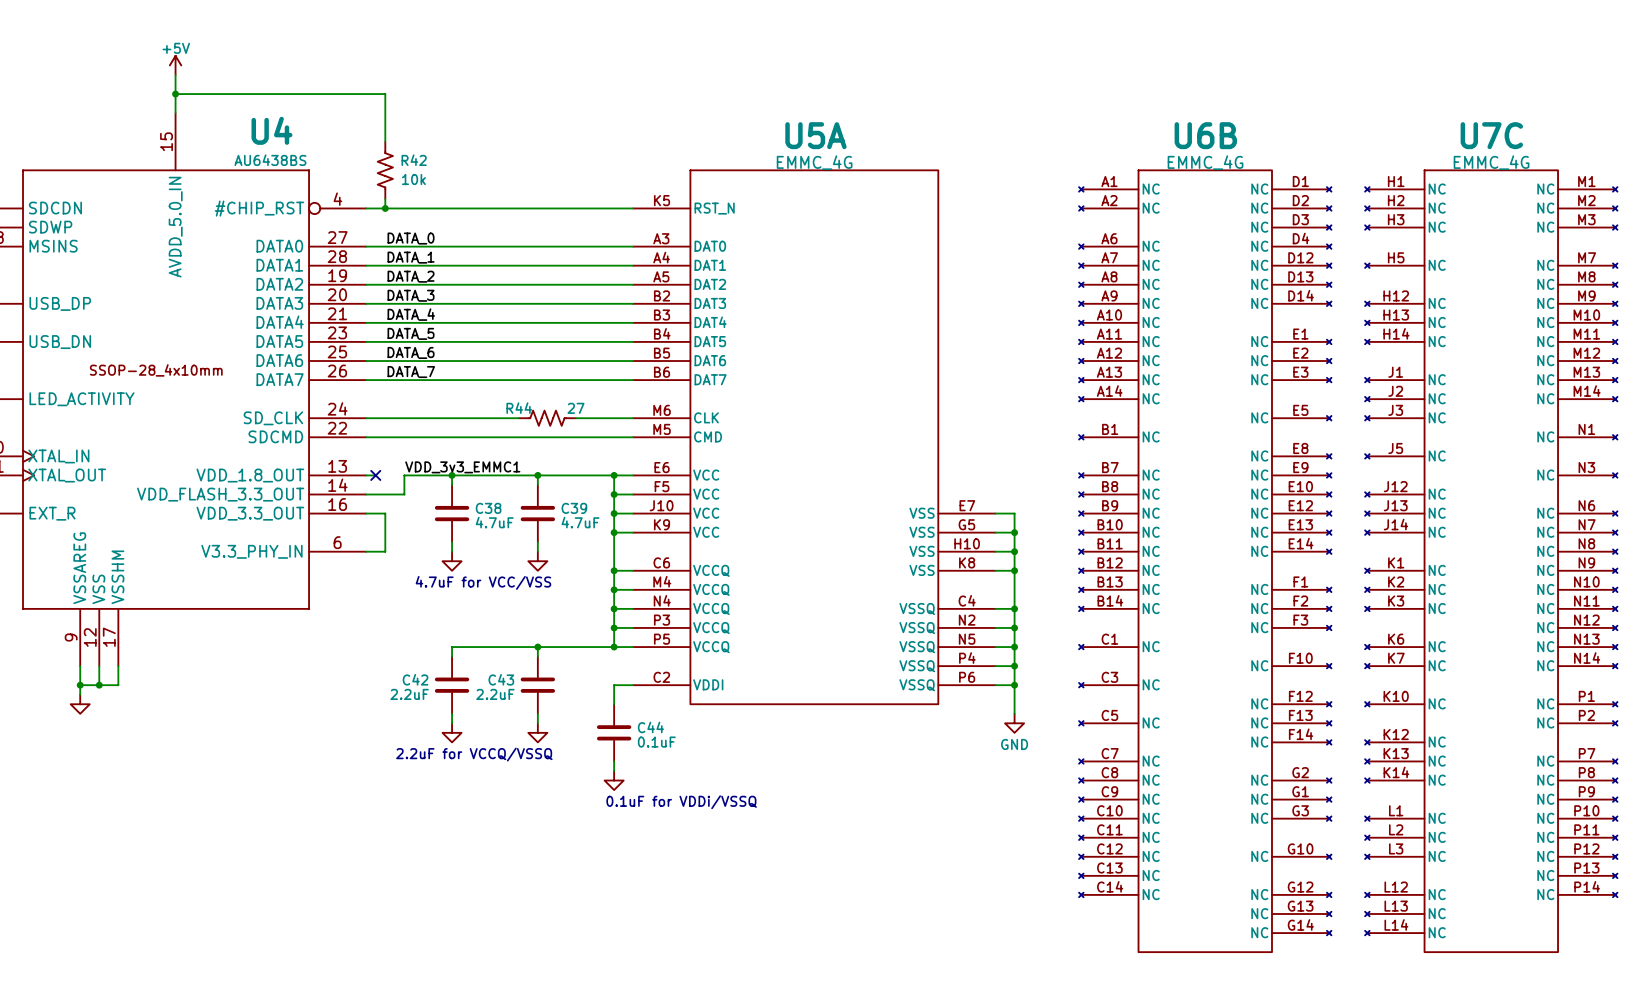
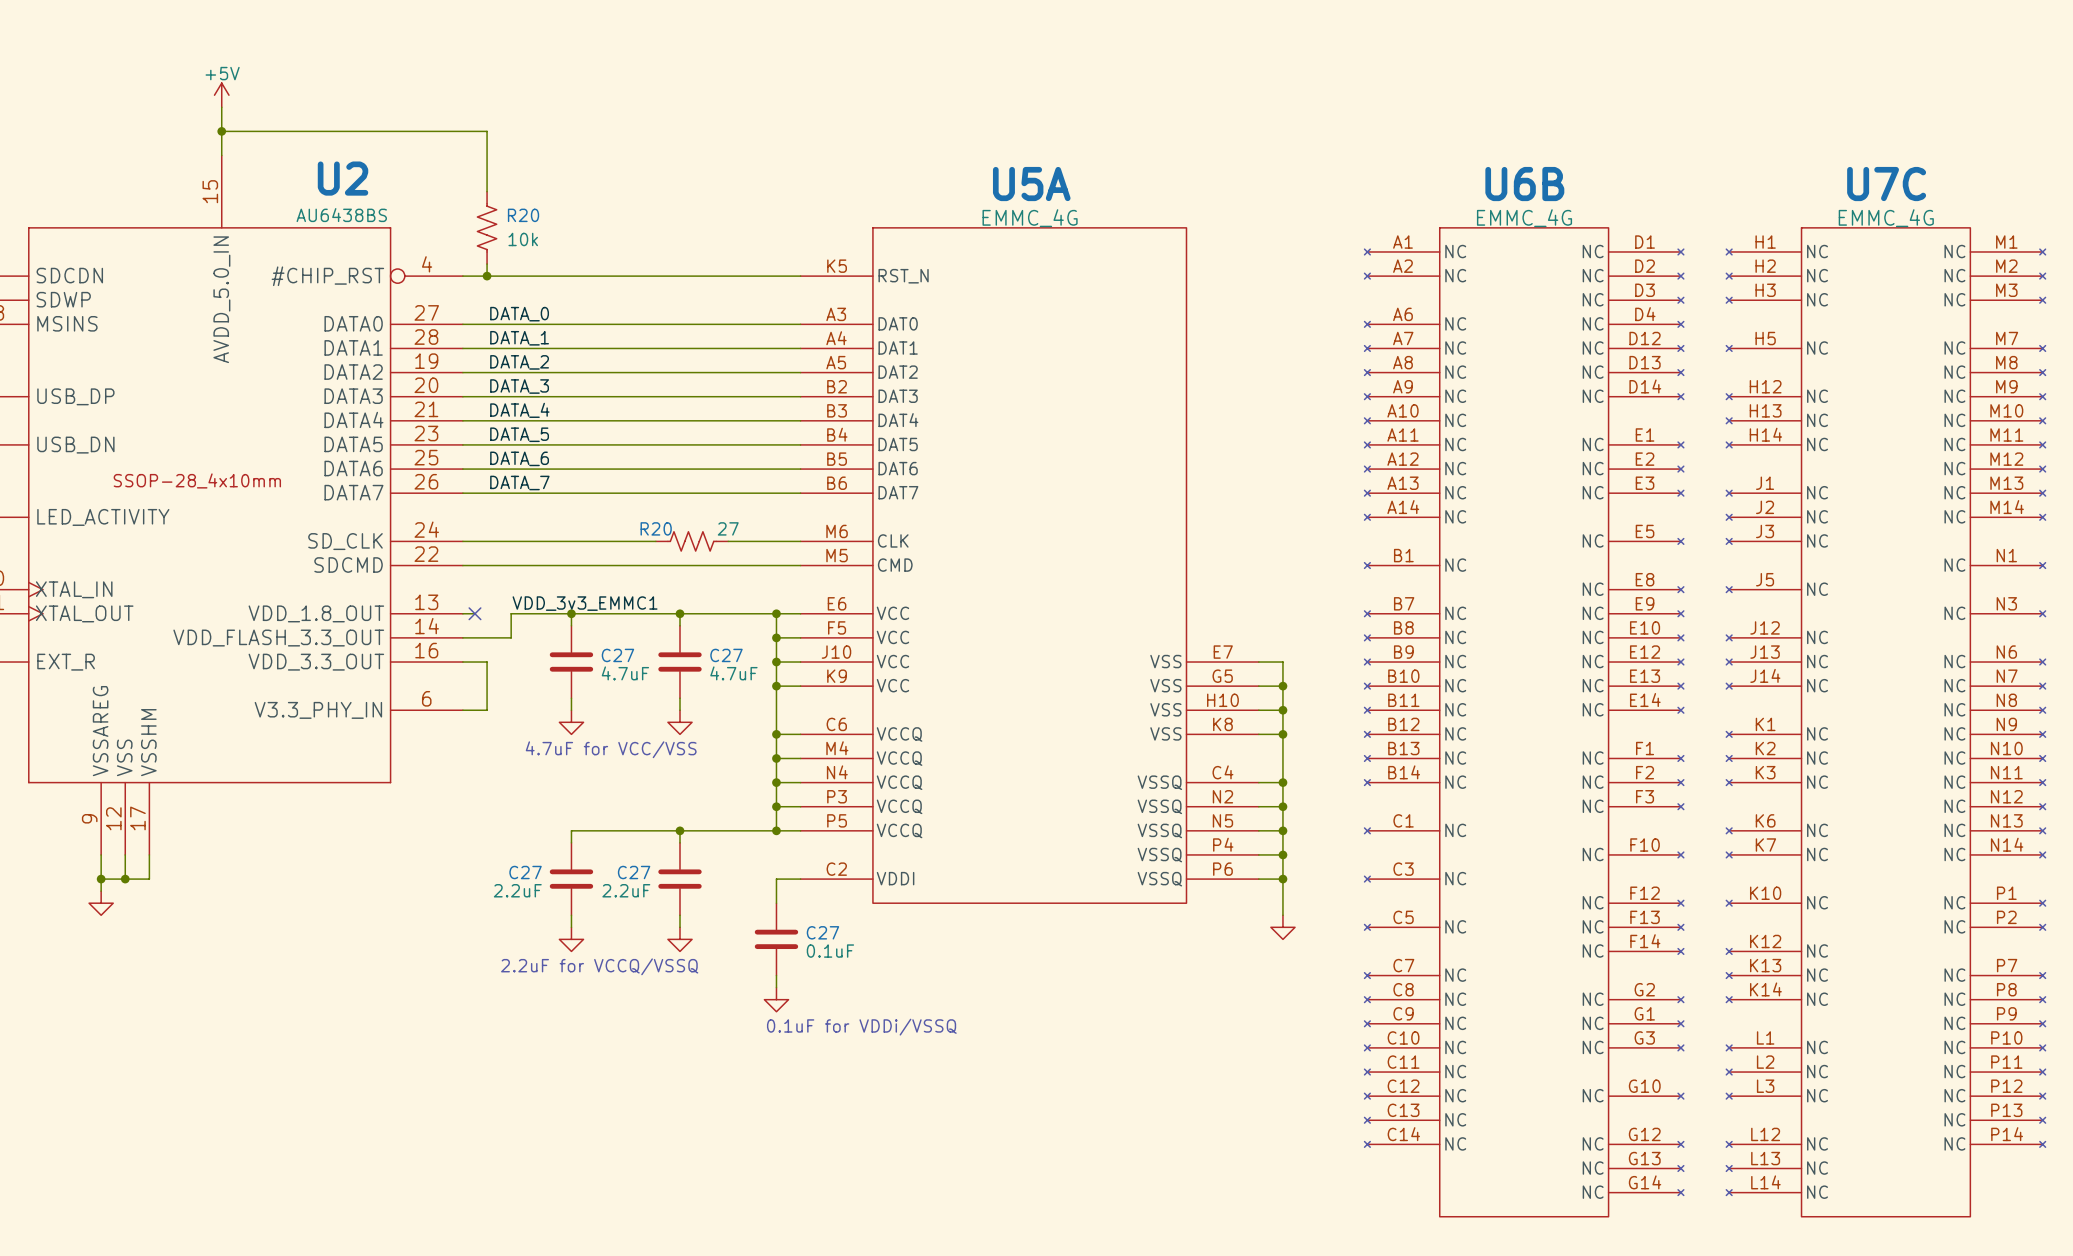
U4 name: U4 (271, 130) -> U2 (343, 178)
R42 name: R42 (414, 160) -> R20 (523, 215)
R44 name: R44 (519, 408) -> R20 (656, 528)
C38 name: C38 (488, 508) -> C27 (617, 655)
C39 name: C39 (574, 508) -> C27 (726, 655)
C42 name: C42 (415, 679) -> C27 (525, 872)
C43 name: C43 (501, 679) -> C27 (634, 872)
C44 name: C44 (650, 727) -> C27 (822, 932)
power symbol text: GND (1014, 744) -> none

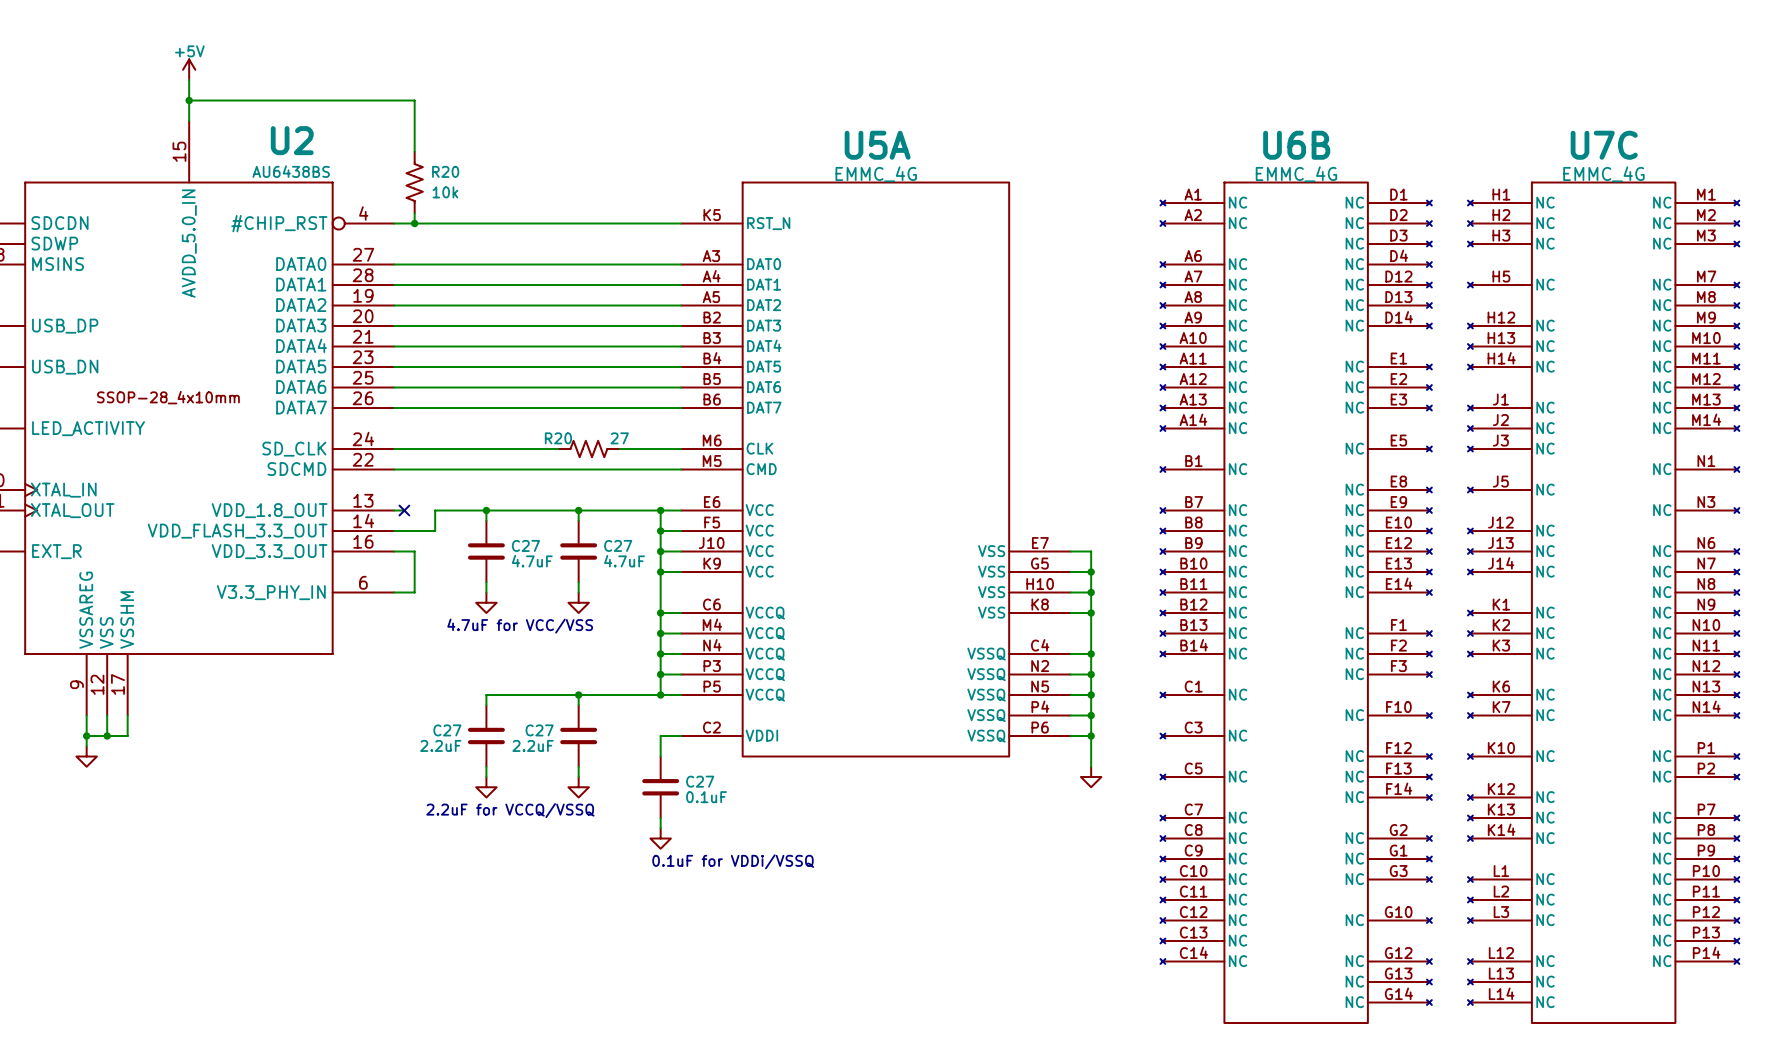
label: DATA_0 (519, 314) -> none
label: DATA_1 (519, 338) -> none
label: DATA_2 (519, 362) -> none
label: DATA_3 (519, 386) -> none
label: DATA_4 (519, 410) -> none
label: DATA_5 (519, 434) -> none
label: DATA_6 (519, 458) -> none
label: DATA_7 (519, 482) -> none
label: VDD_3v3_EMMC1 (585, 603) -> none

